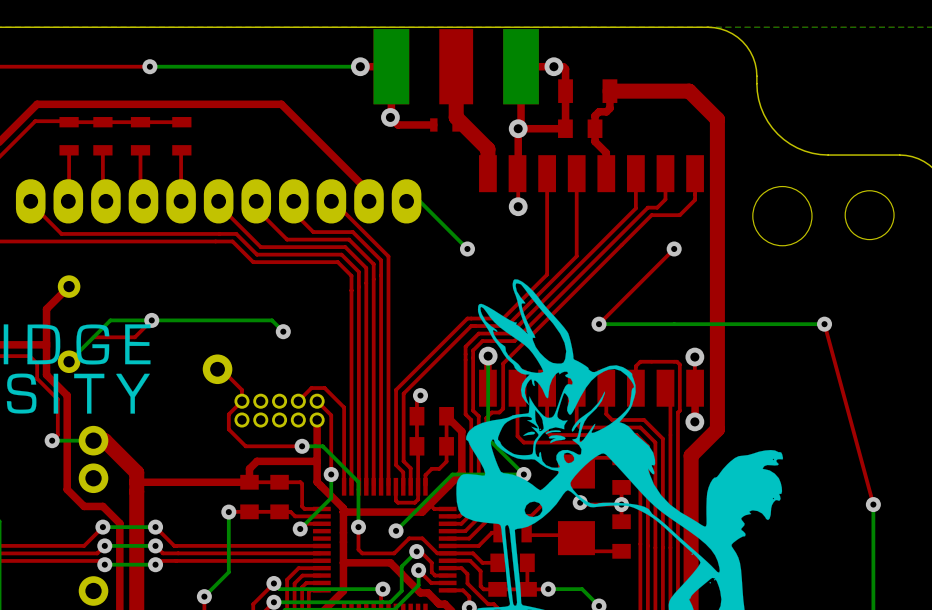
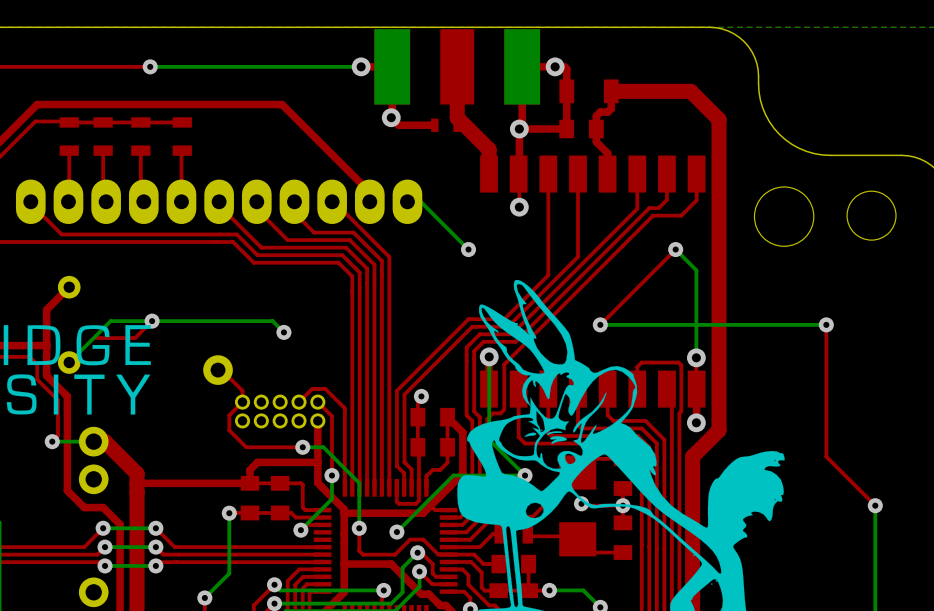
bottom track: none -> (675, 249) (696, 270) (696, 357)
top track: (824, 324) (873, 504) -> (826, 324) (826, 456) (875, 505)

